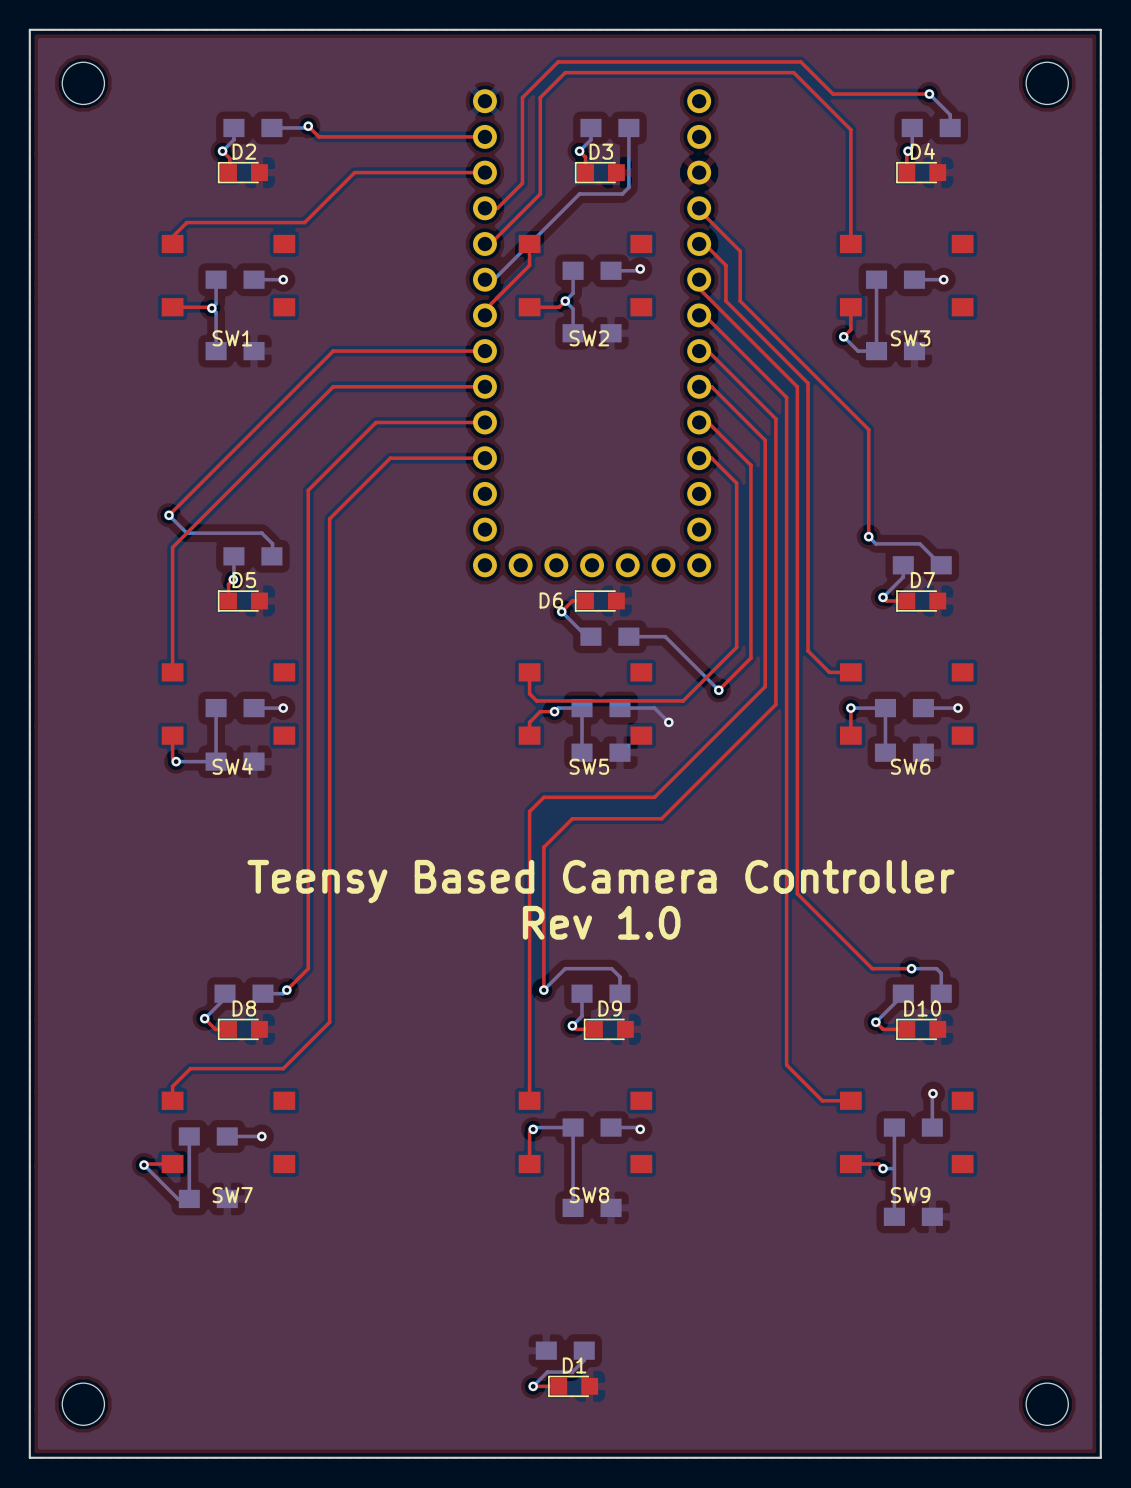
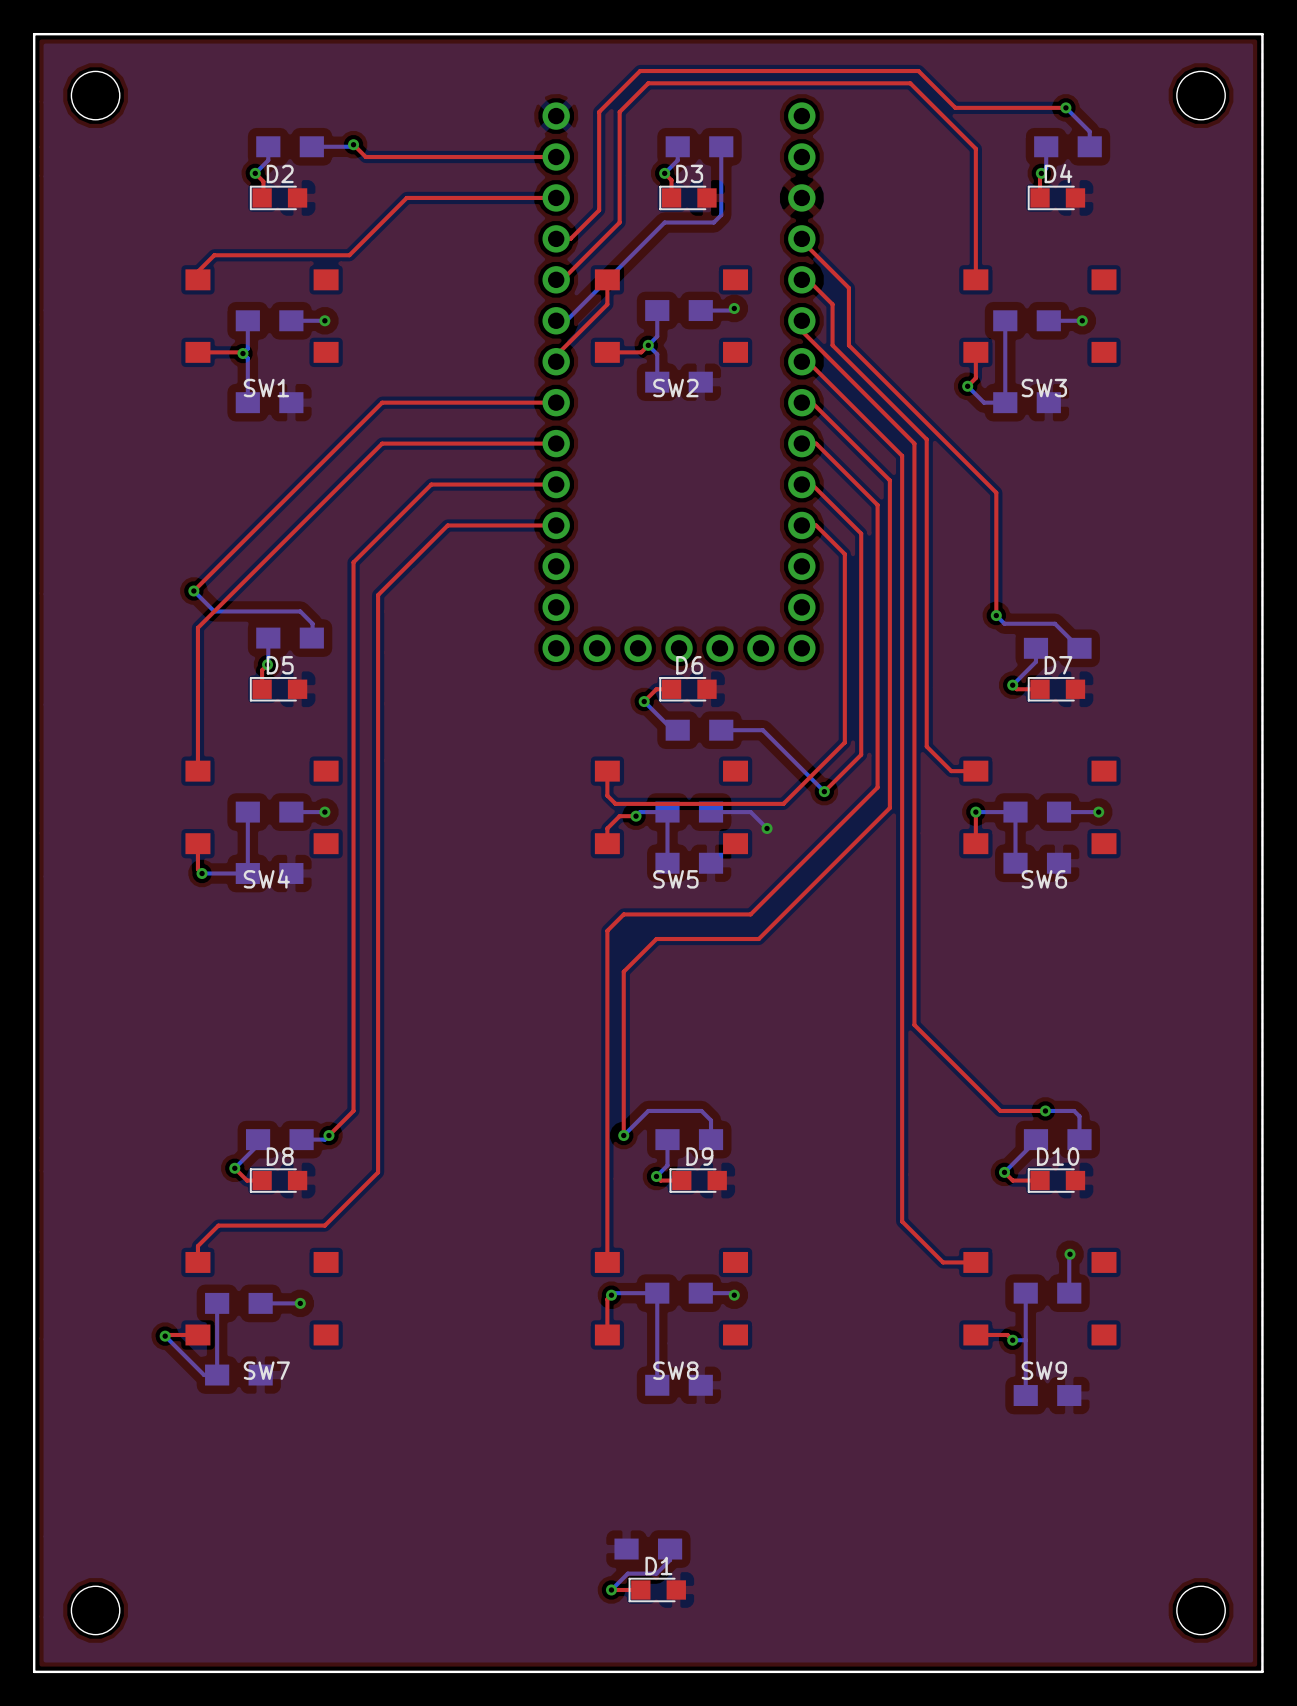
D6 name position: D6 (551, 600) -> D6 (689, 665)
text: Teensy Based Camera Controller (600, 881) -> none
text: Rev 1.0 (601, 922) -> none

